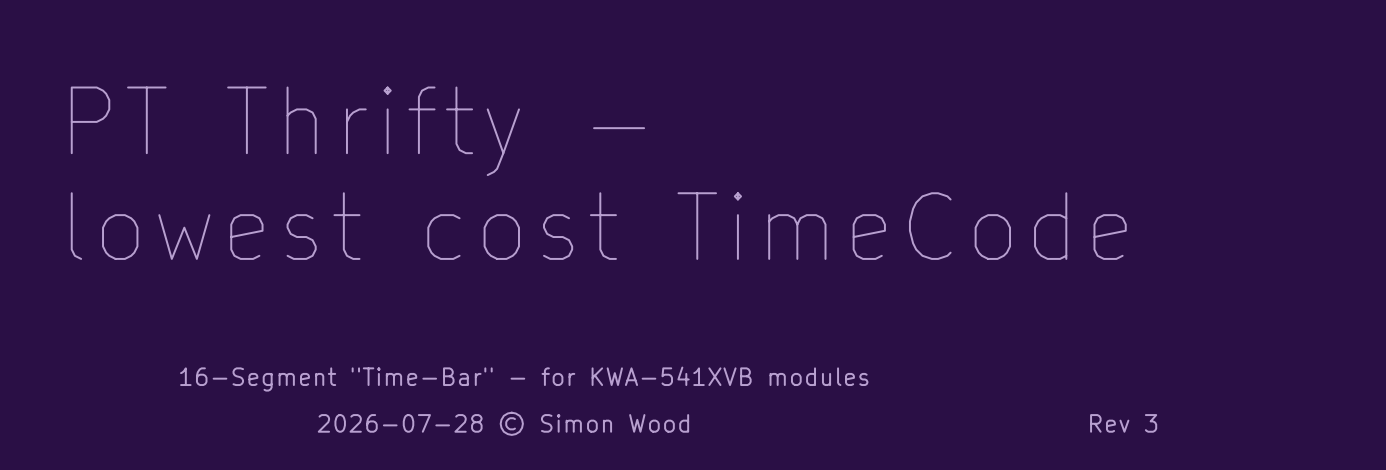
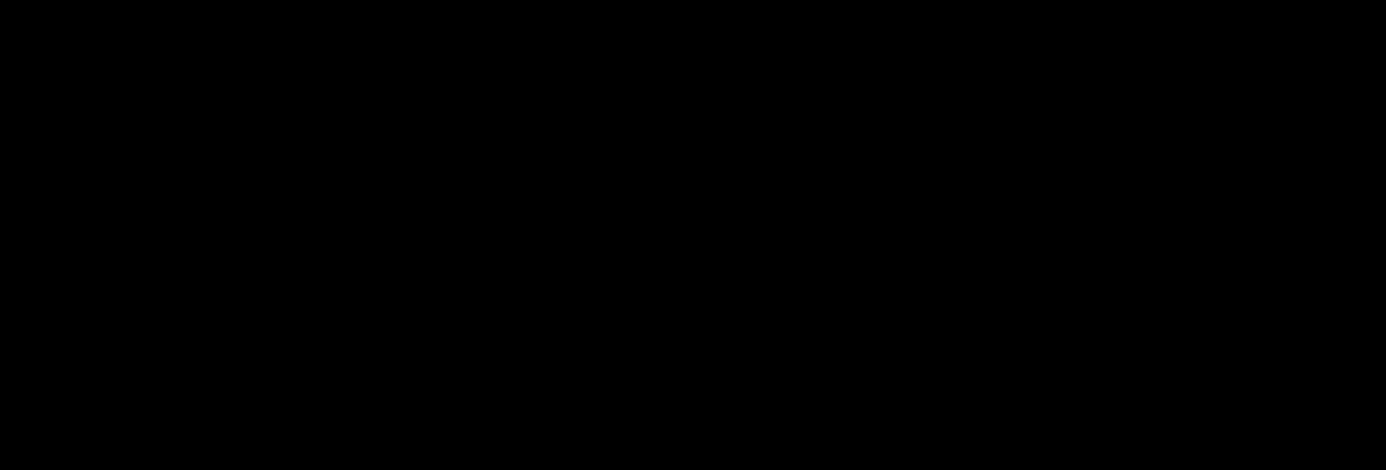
text: PT Thrifty - (357, 131) -> none
text: lowest cost TimeCode (598, 226) -> none
text: 16-Segment "Time-Bar" - for KWA-541XVB modules (524, 379) -> none
text: 2026-07-28 © Simon Wood (503, 423) -> none
text: Rev 3 (1123, 423) -> none

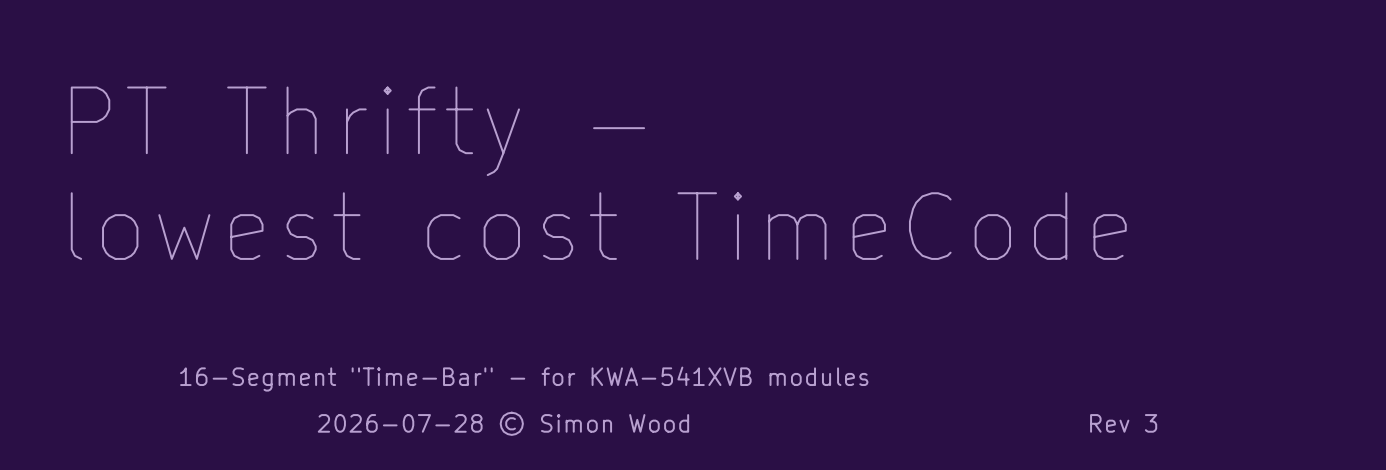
text: none -> PT Thrifty - (357, 131)
text: none -> lowest cost TimeCode (598, 226)
text: none -> 16-Segment "Time-Bar" - for KWA-541XVB modules (524, 379)
text: none -> 2026-07-28 © Simon Wood (503, 423)
text: none -> Rev 3 (1123, 423)

